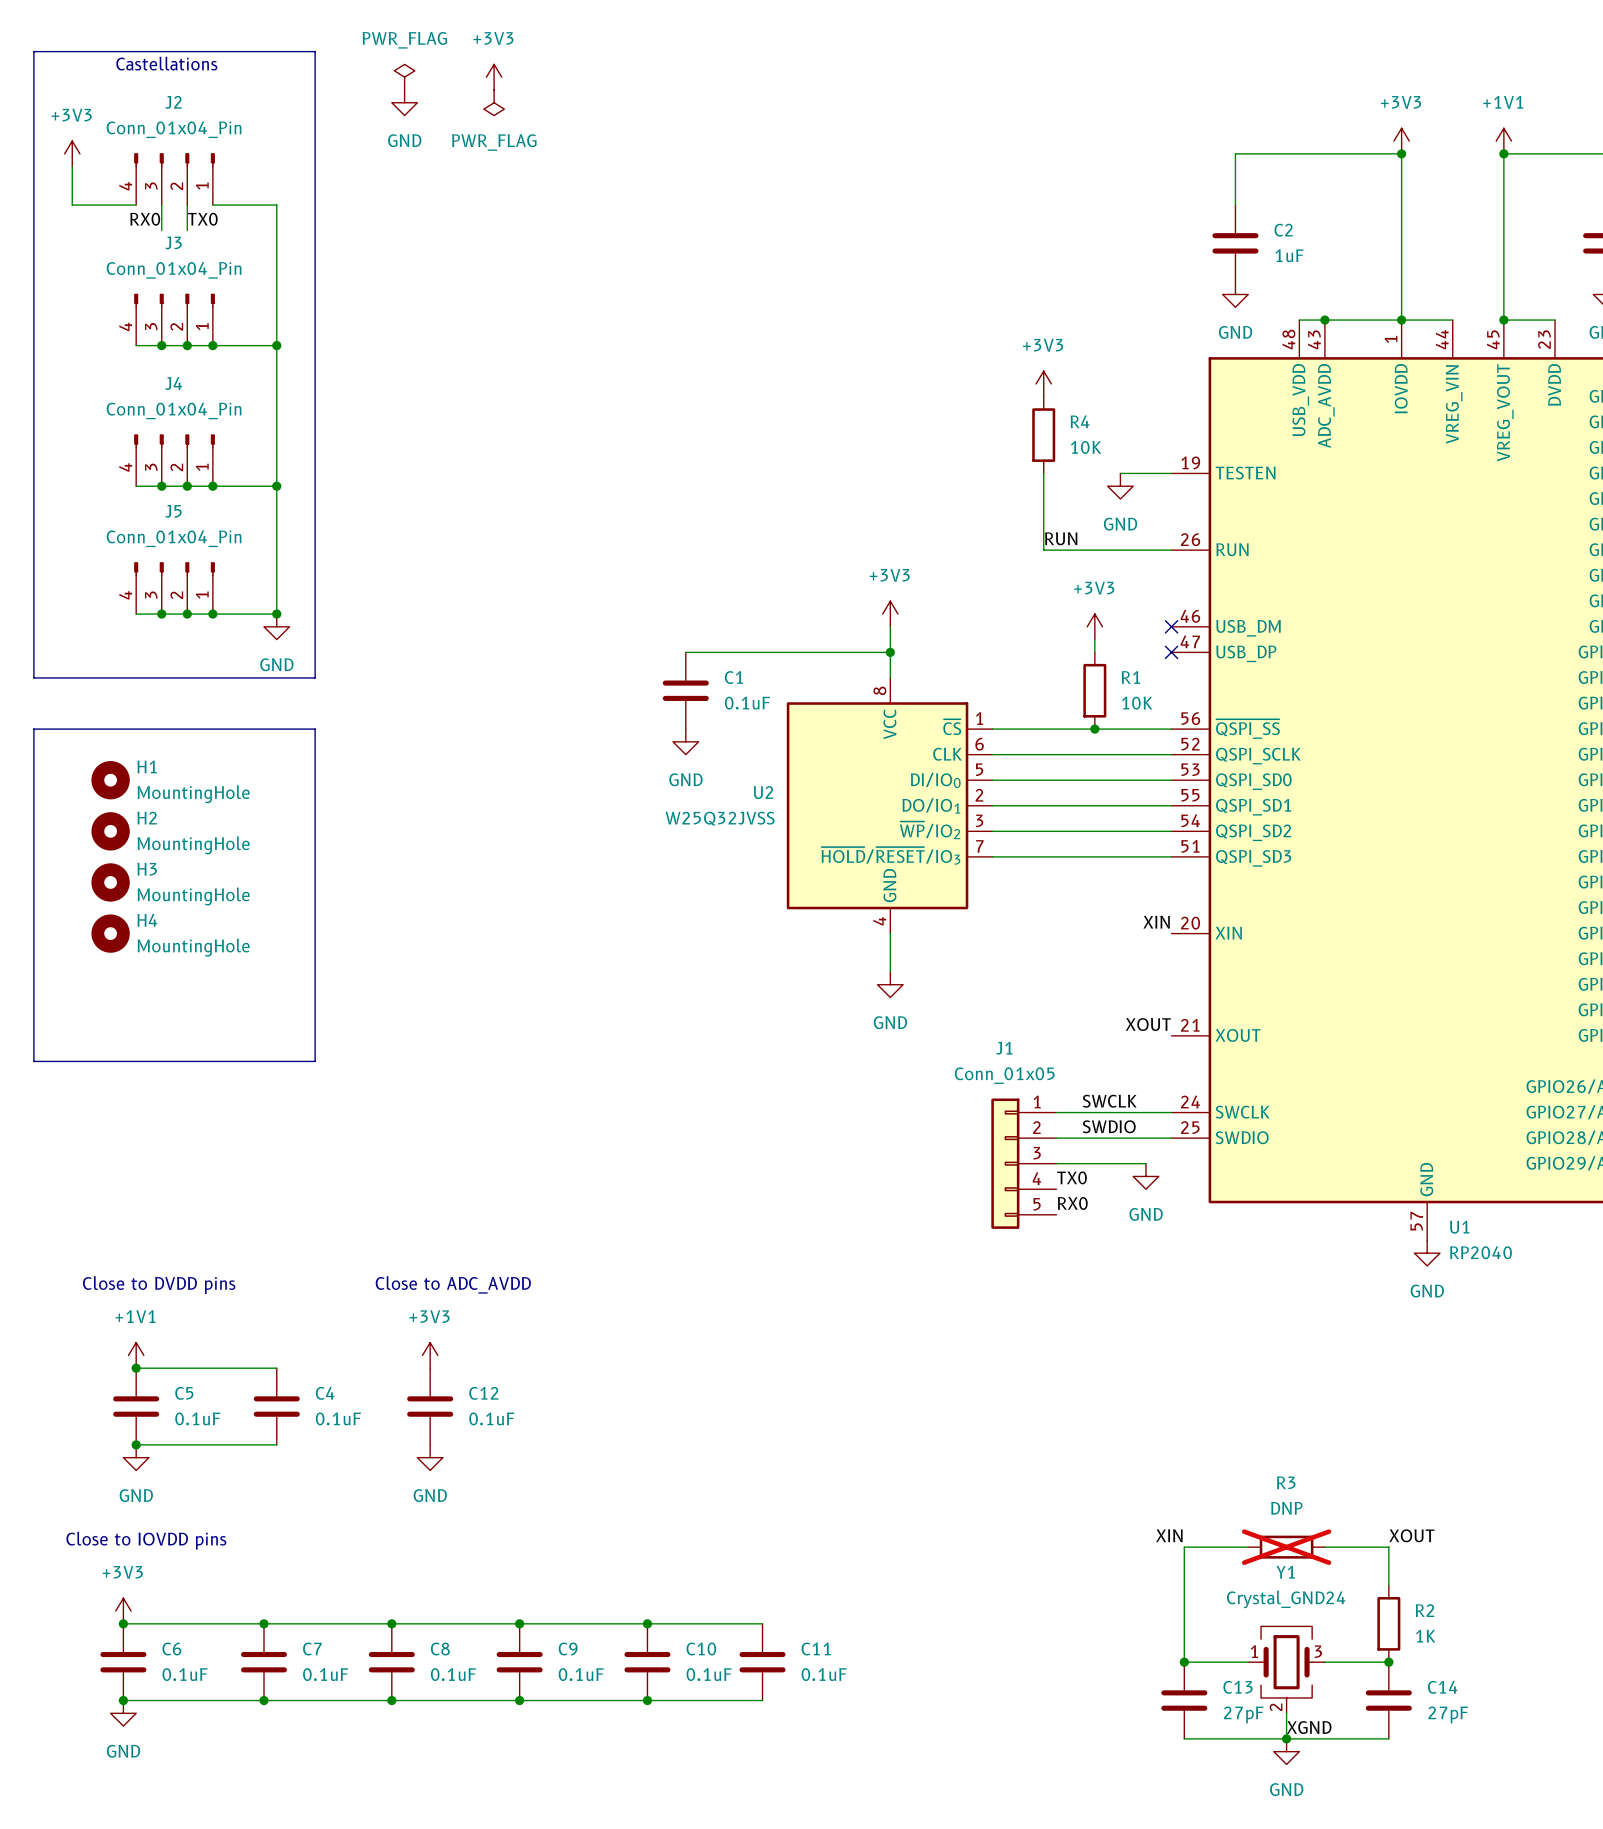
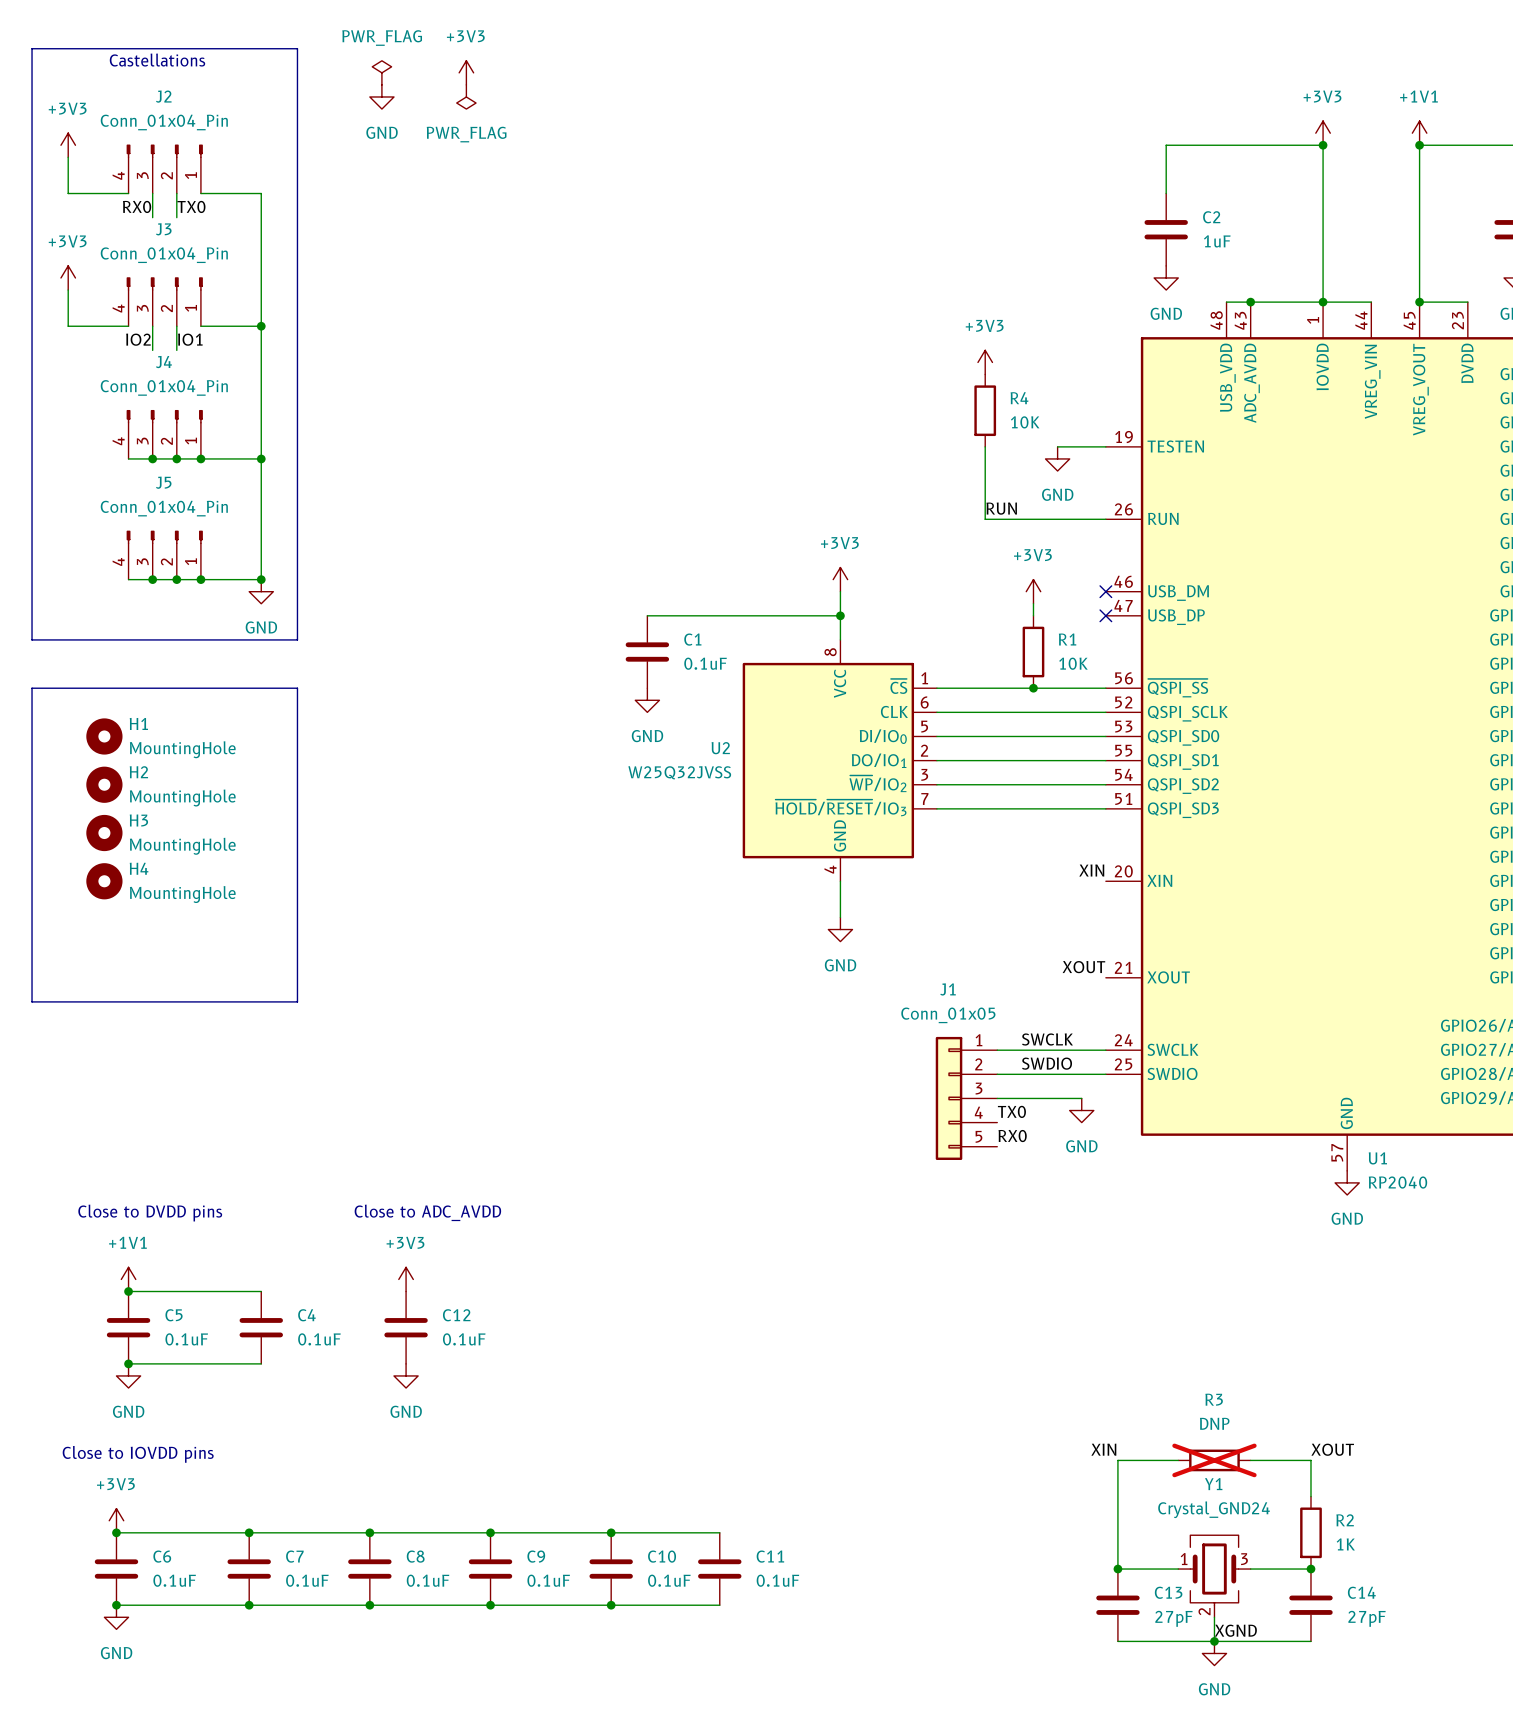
power symbol: none -> +3V3 (68, 277)
wire: (136, 345) (212, 345) -> (128, 326) (68, 326) (68, 290)
wire: none -> (152, 326) (152, 350)
junction: (161, 345) -> none
wire: none -> (176, 326) (176, 350)
junction: (187, 345) -> none
junction: (212, 345) -> none
label: none -> IO2 (138, 339)
label: none -> IO1 (190, 339)

